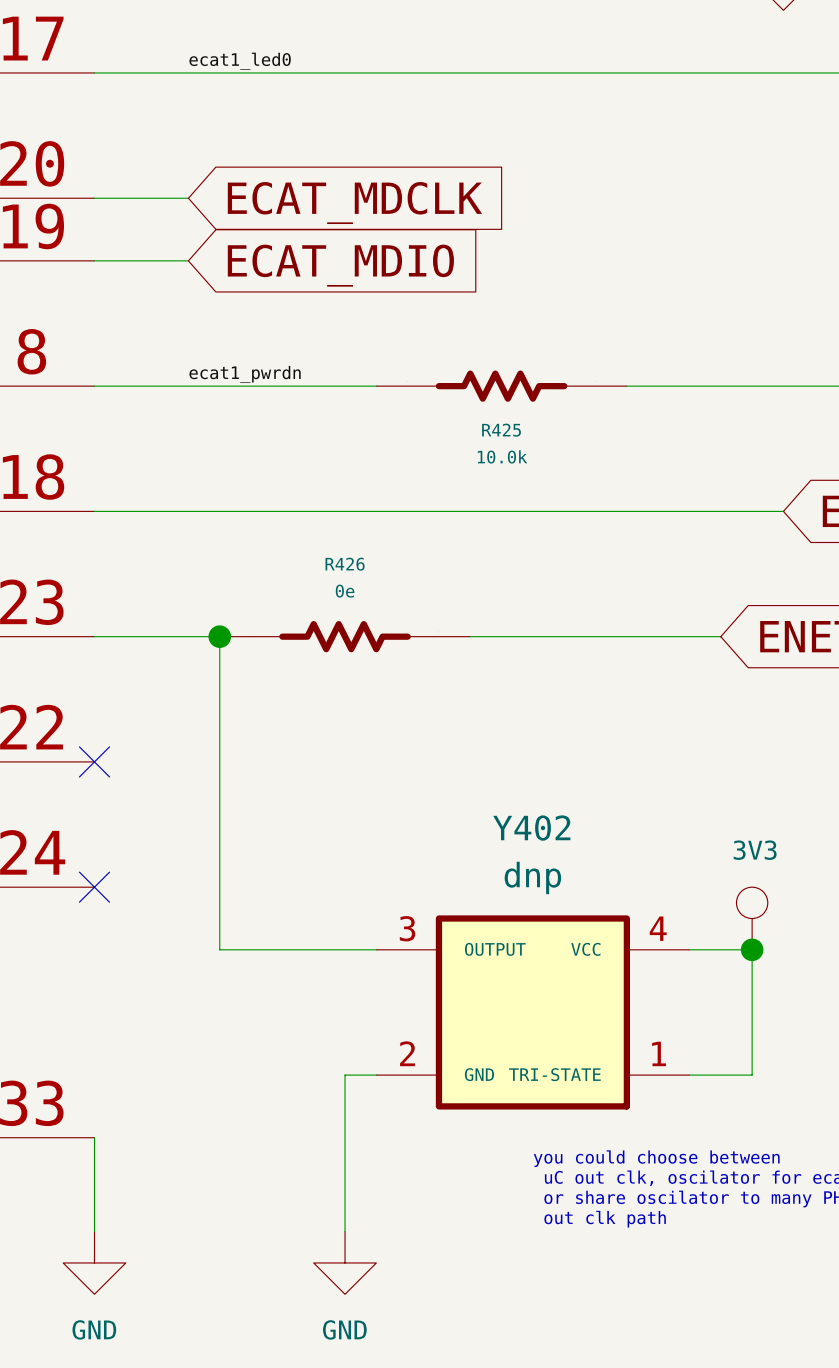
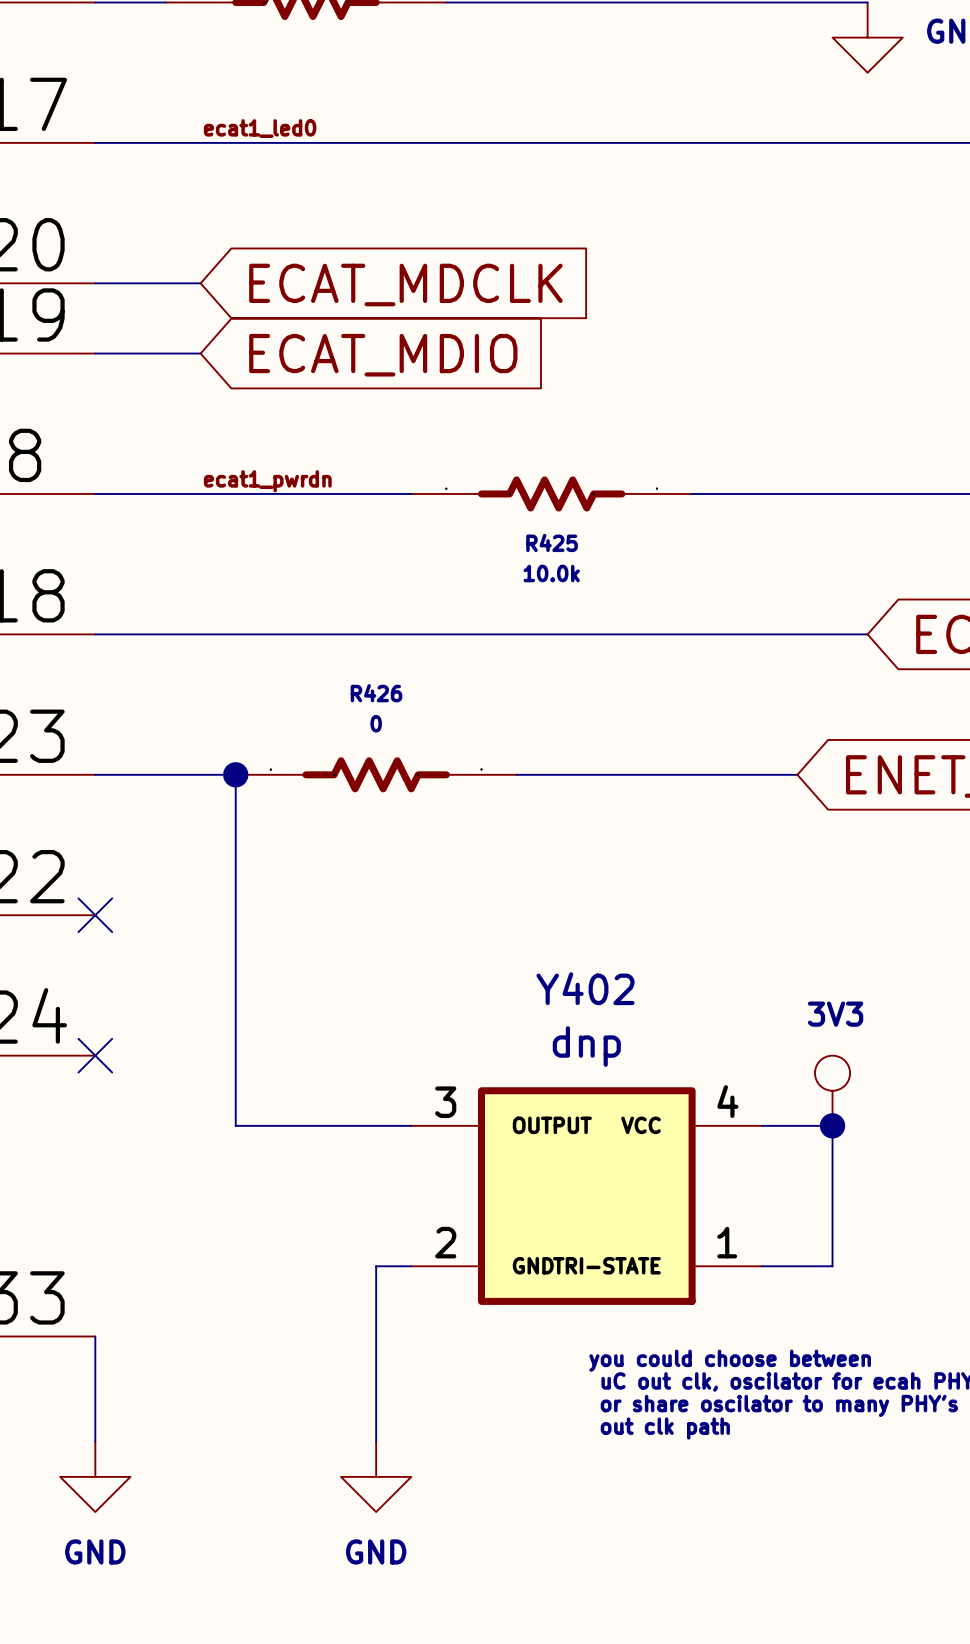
R426 value: 0e (345, 591) -> 0 (376, 723)

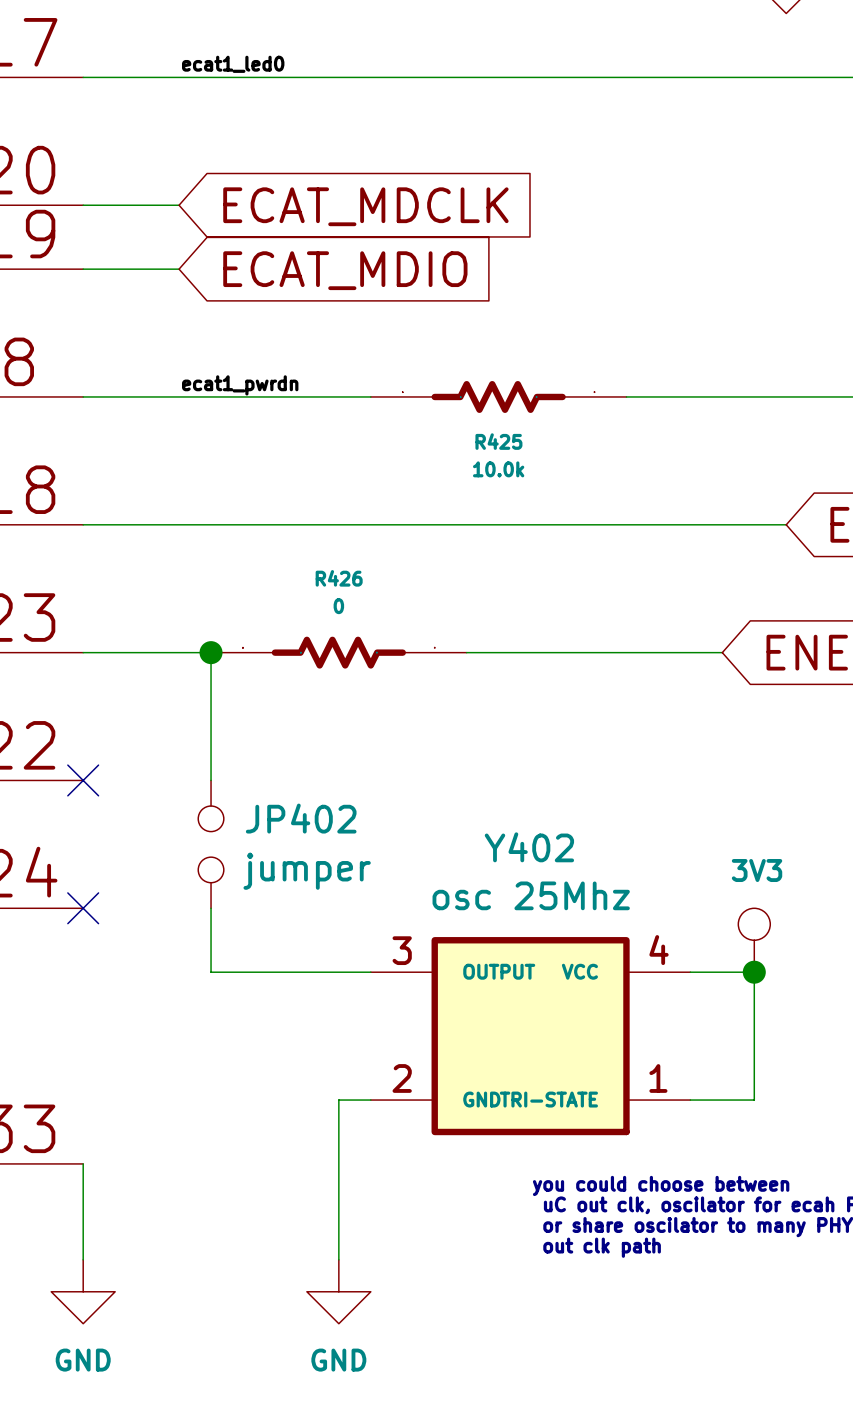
wire: (235, 915) (235, 1055) -> none
JP402: none -> jumper (211, 844)
Y402 value: dnp (586, 1046) -> osc 25Mhz (531, 895)

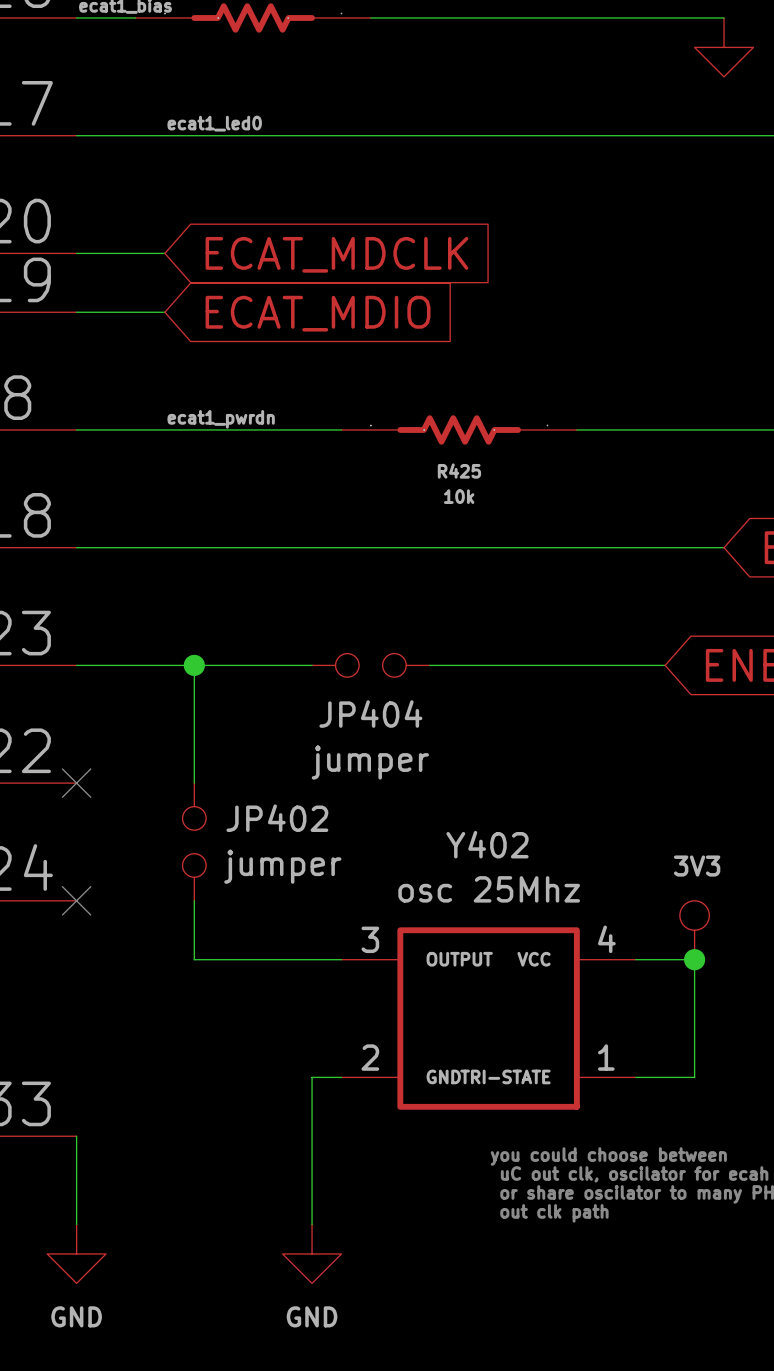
R425 value: 10.0k (498, 469) -> 10k (459, 496)
R426: 0 (338, 652) -> none
JP404: none -> jumper (370, 665)

